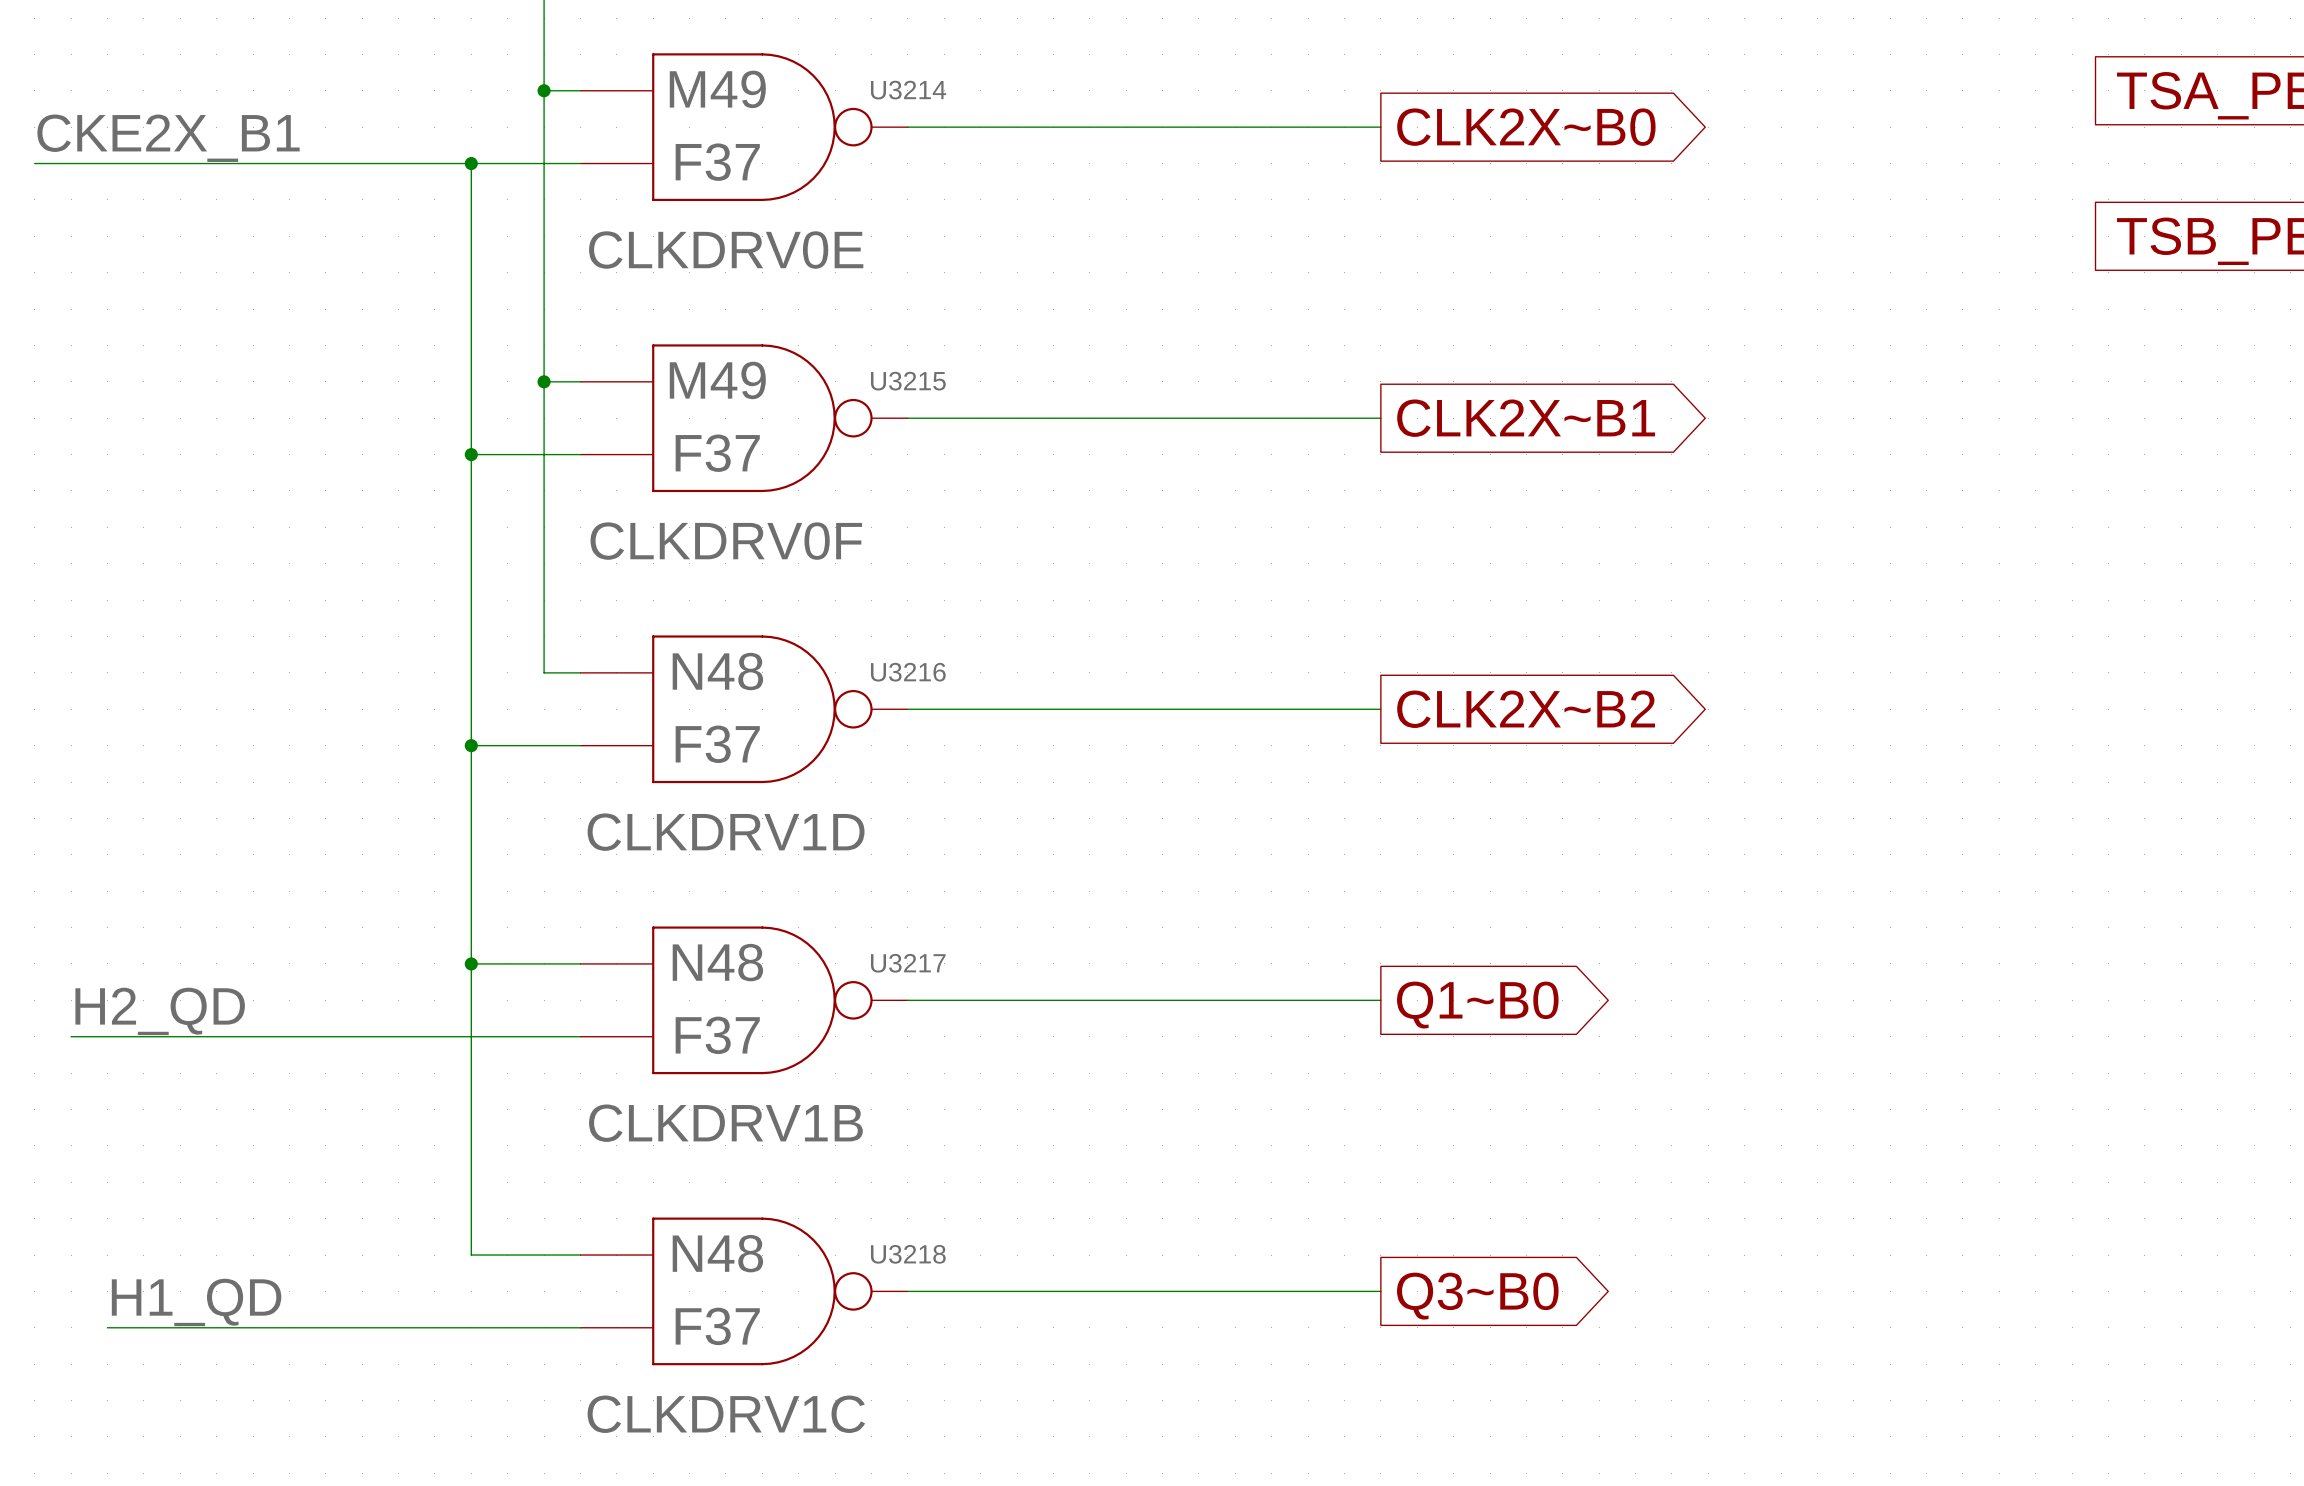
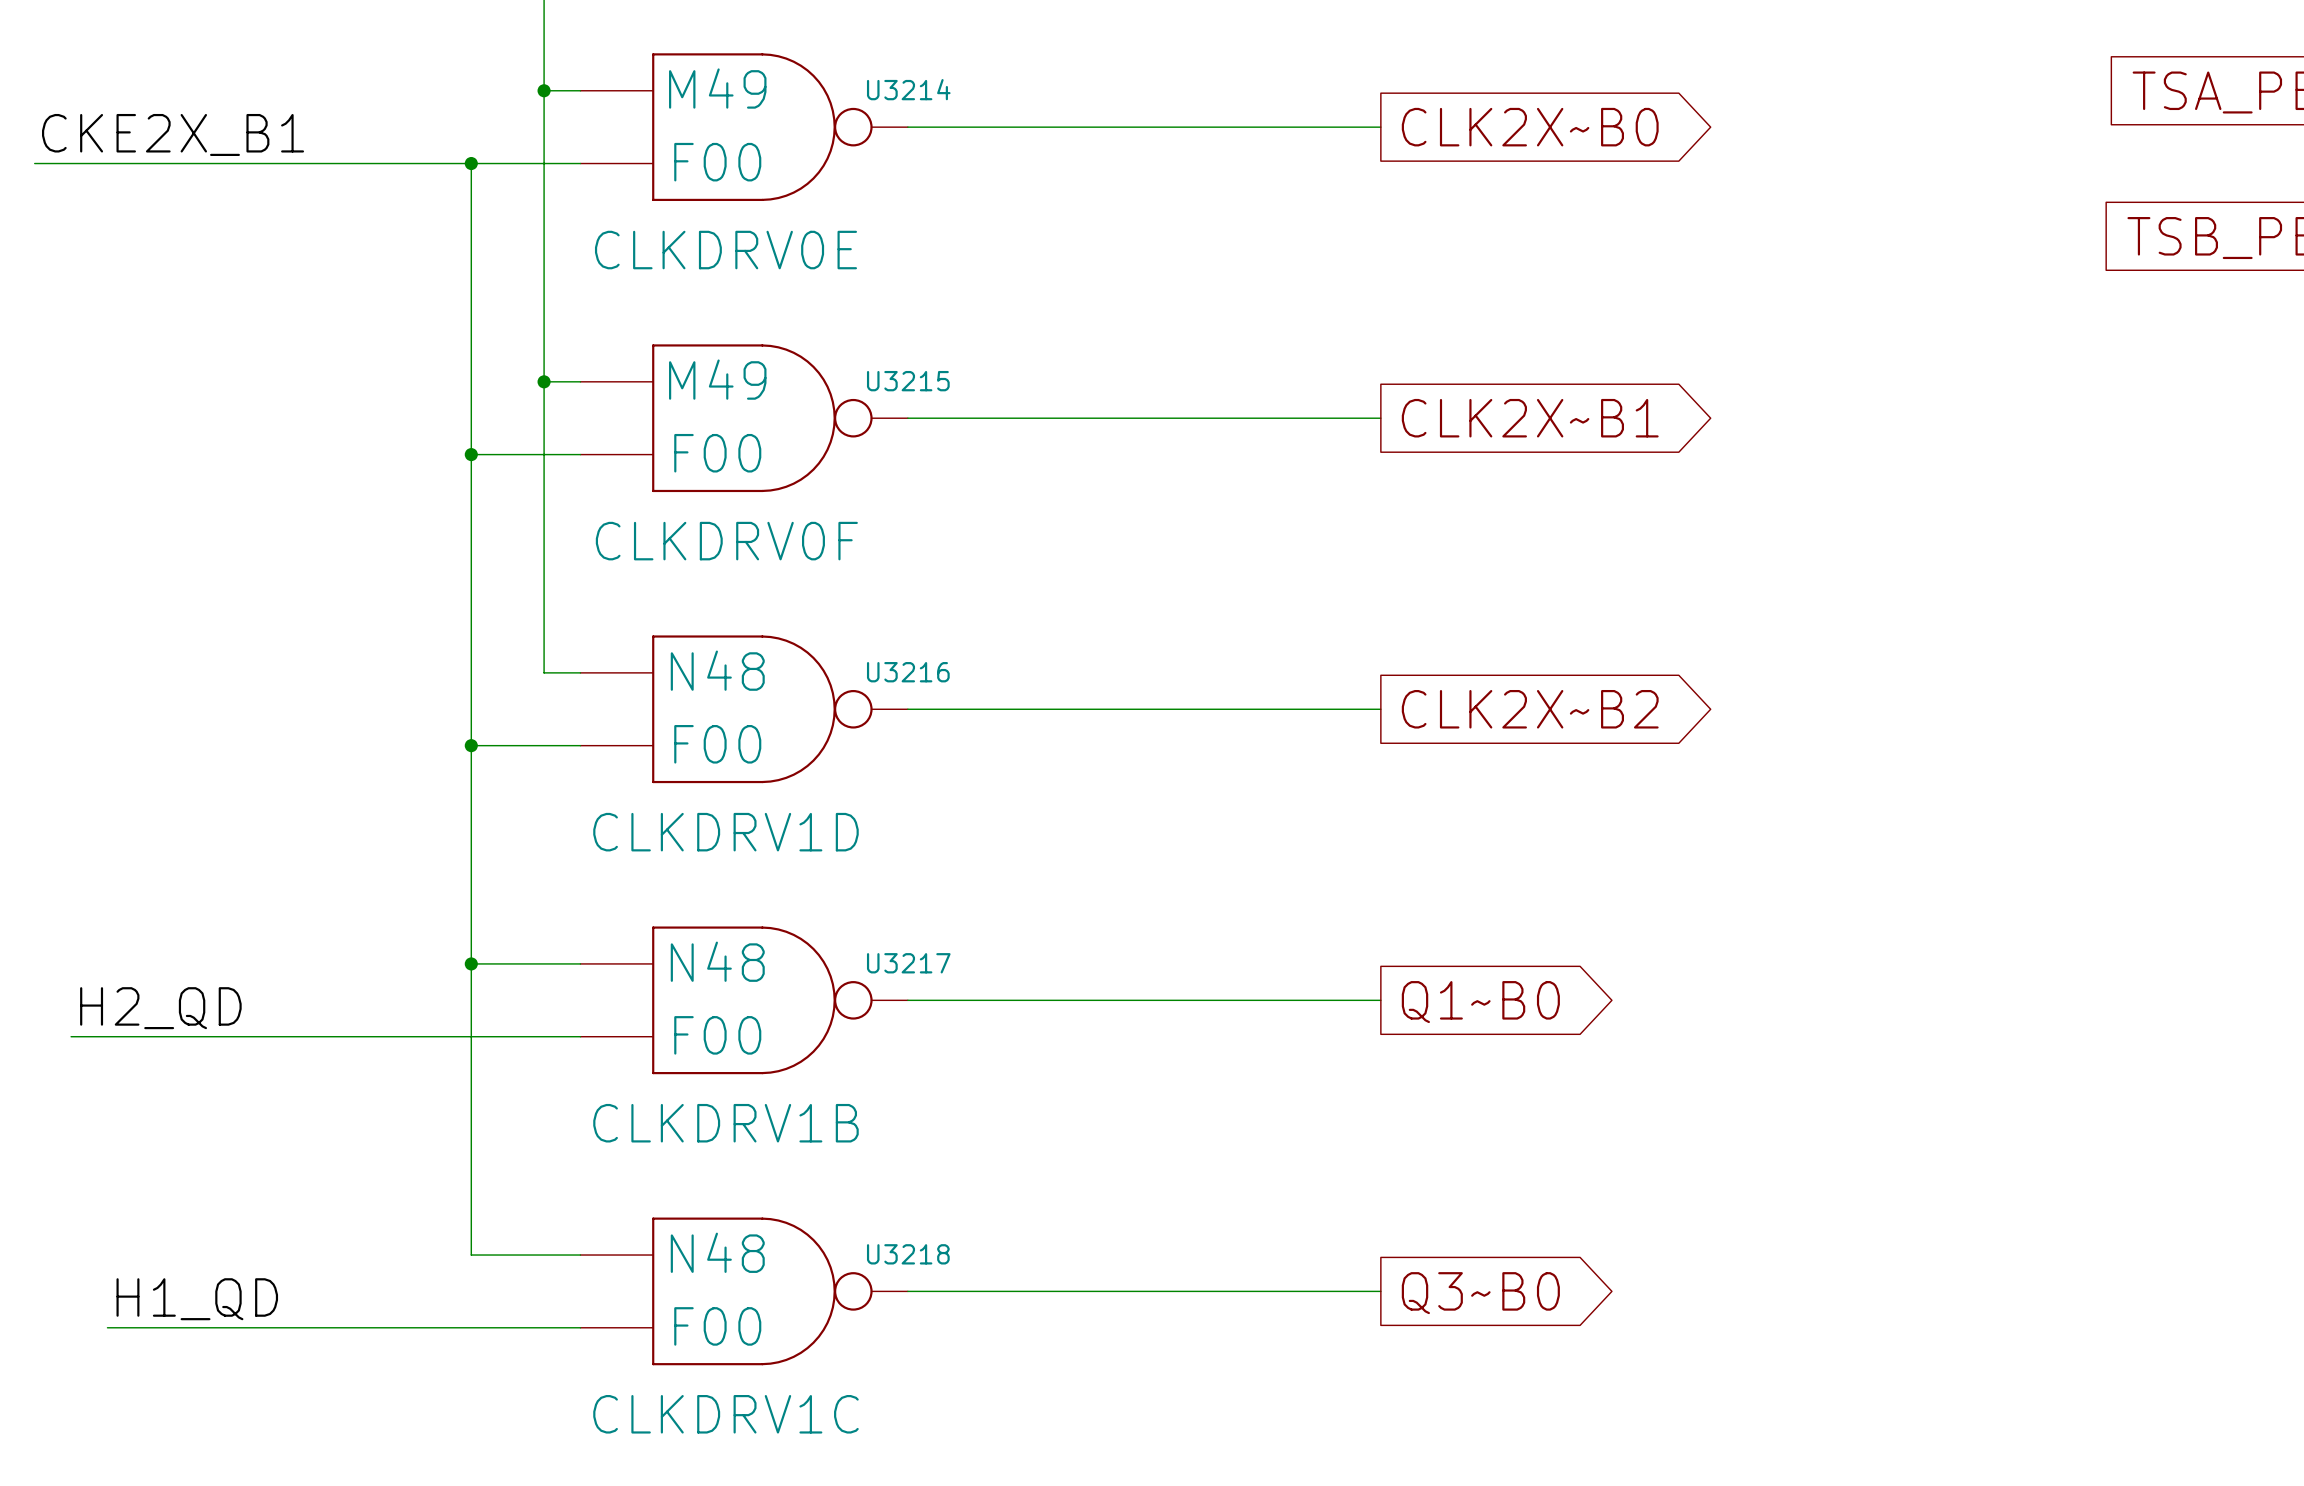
U3214 value: F37 (717, 162) -> F00 (717, 162)
U3215 value: F37 (717, 453) -> F00 (717, 453)
U3216 value: F37 (717, 744) -> F00 (717, 744)
U3217 value: F37 (717, 1035) -> F00 (717, 1035)
U3218 value: F37 (717, 1326) -> F00 (717, 1326)

